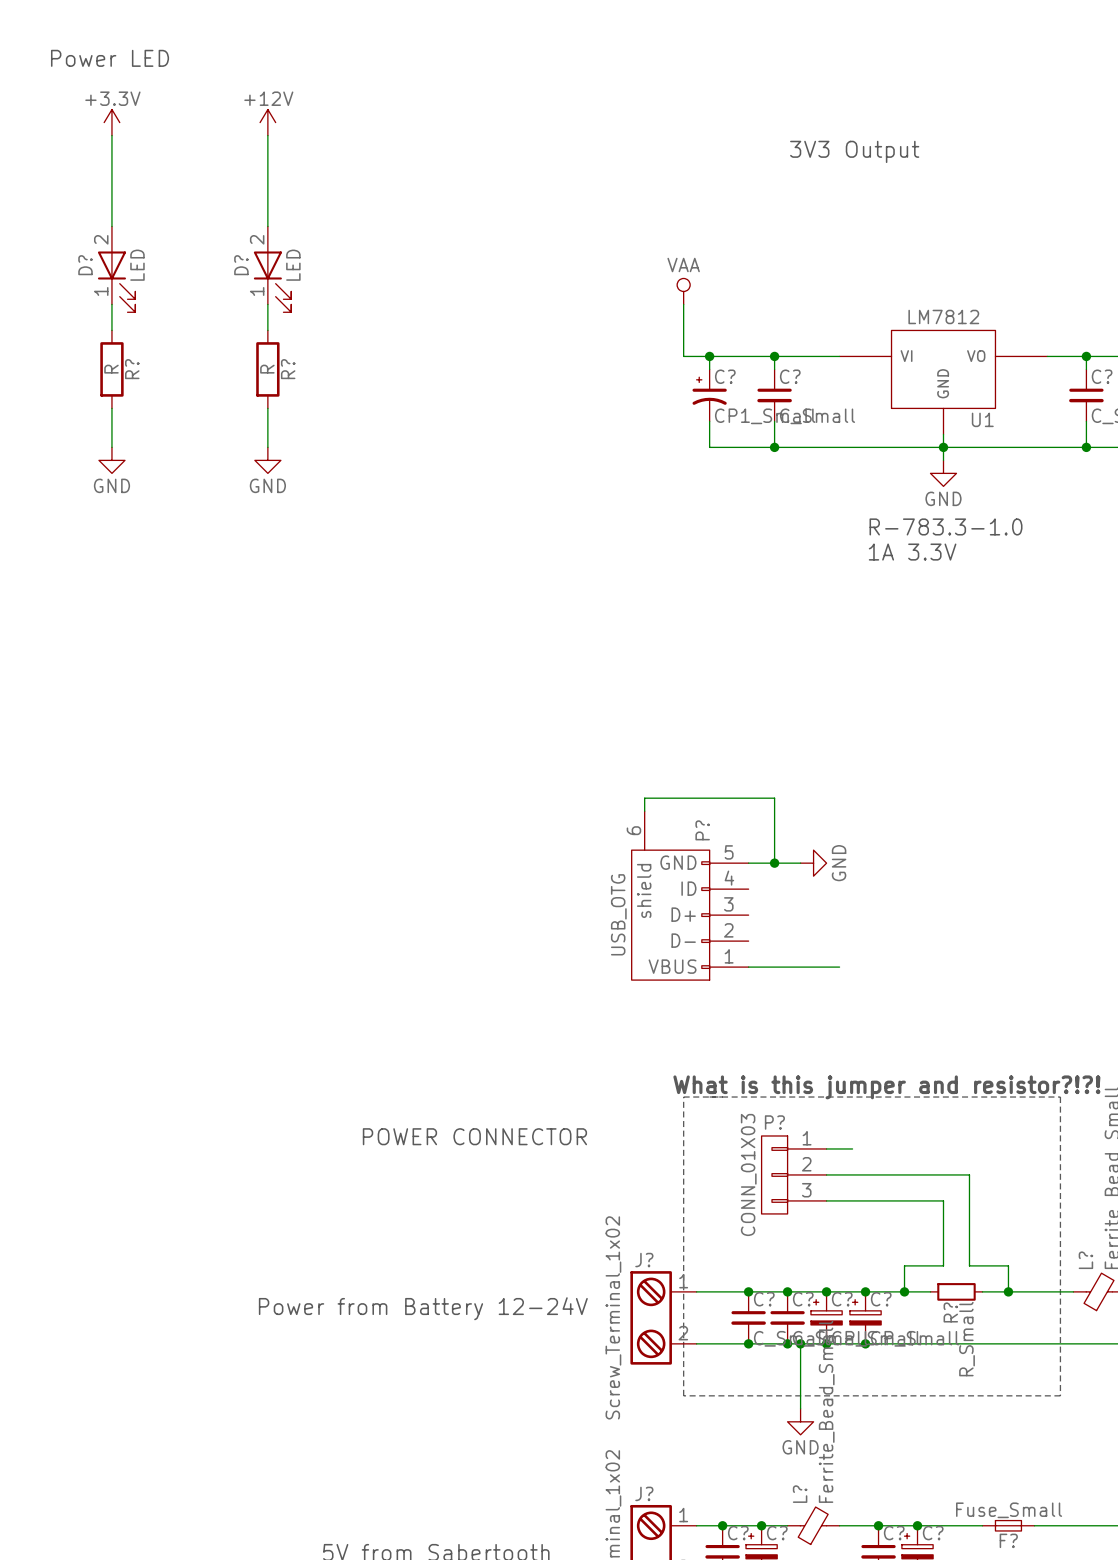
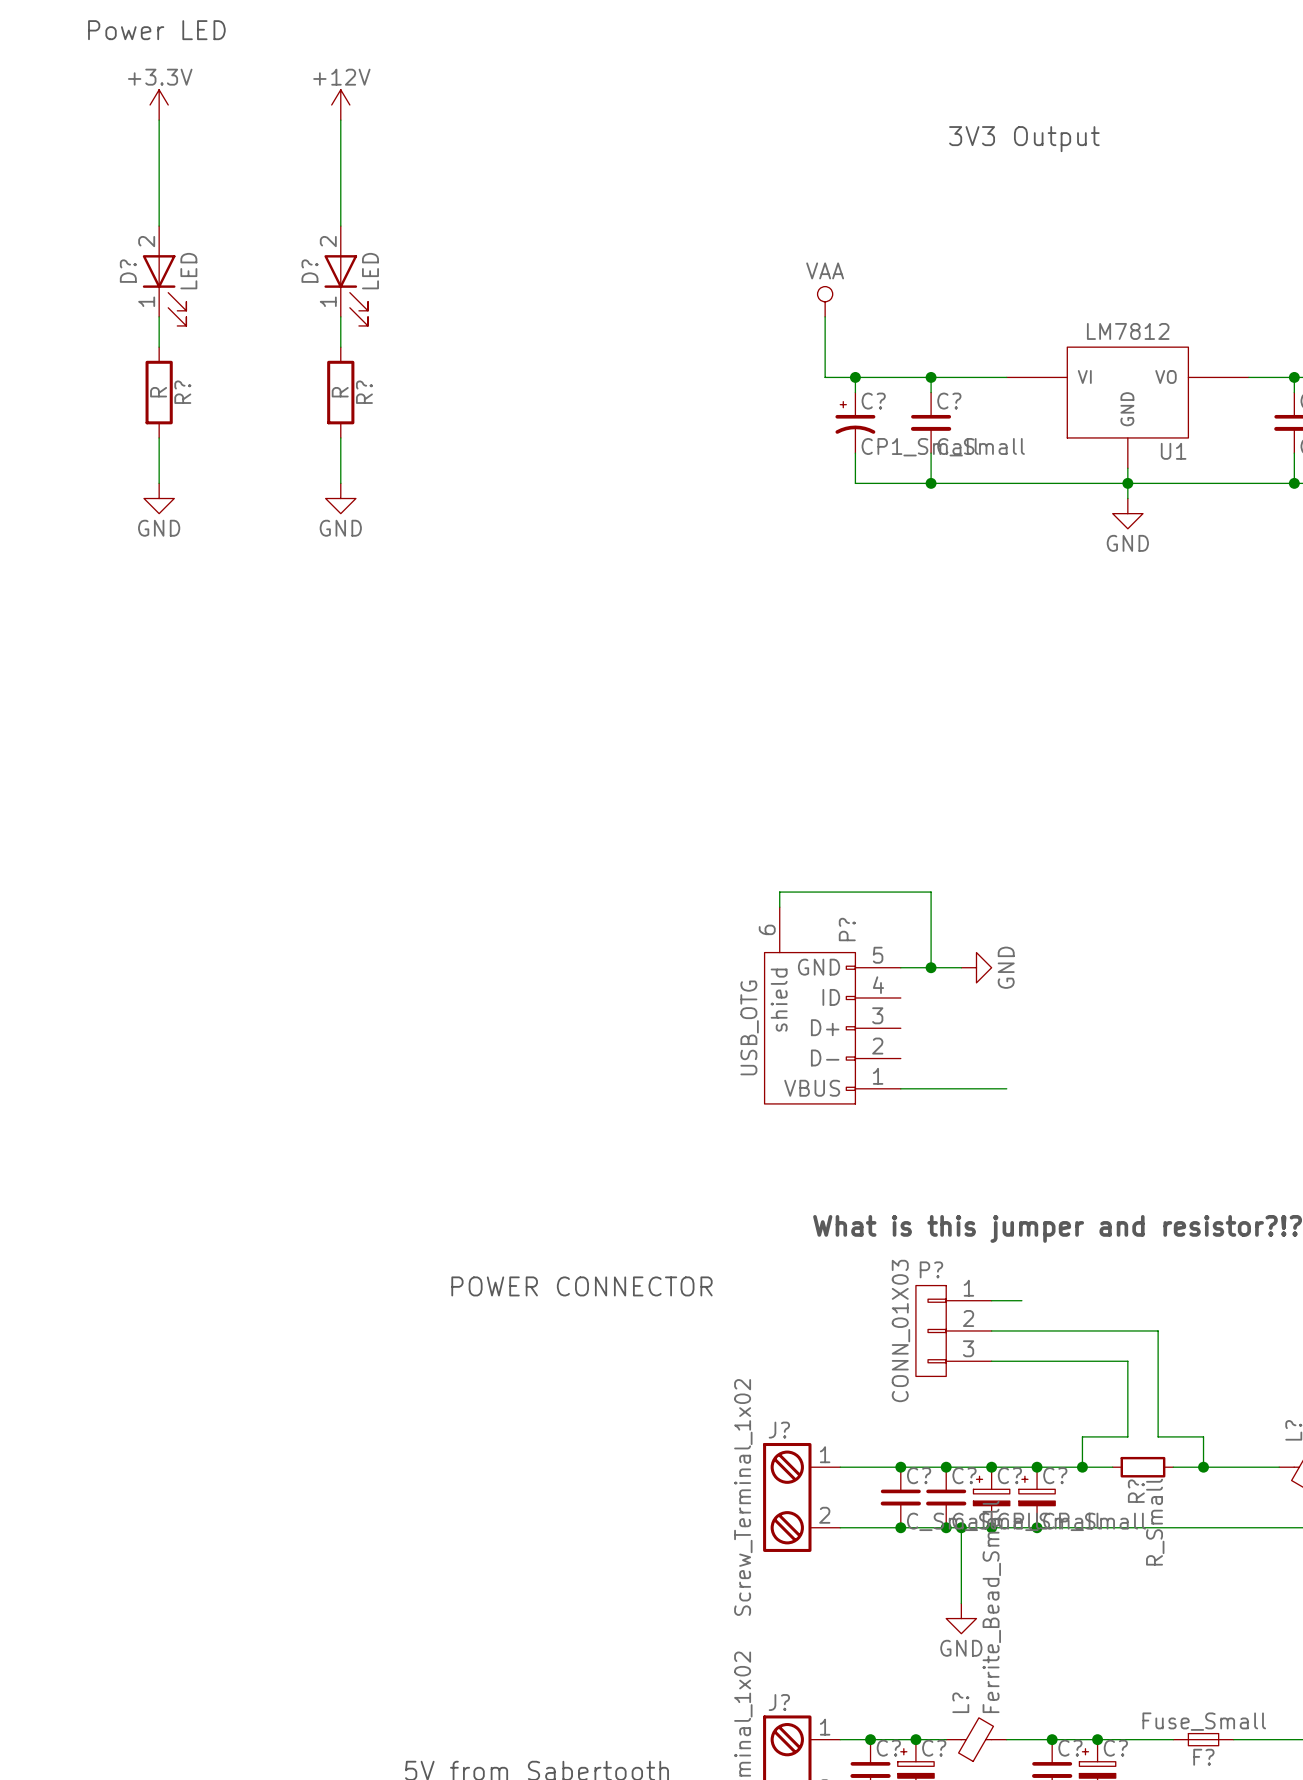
text: R-783.3-1.0 (946, 526) -> none
text: 1A 3.3V (912, 552) -> none
line: (683, 1097) (1060, 1097) (1060, 1395) (683, 1395) (683, 1097) -> none
text: Power from Battery 12-24V (423, 1308) -> none

